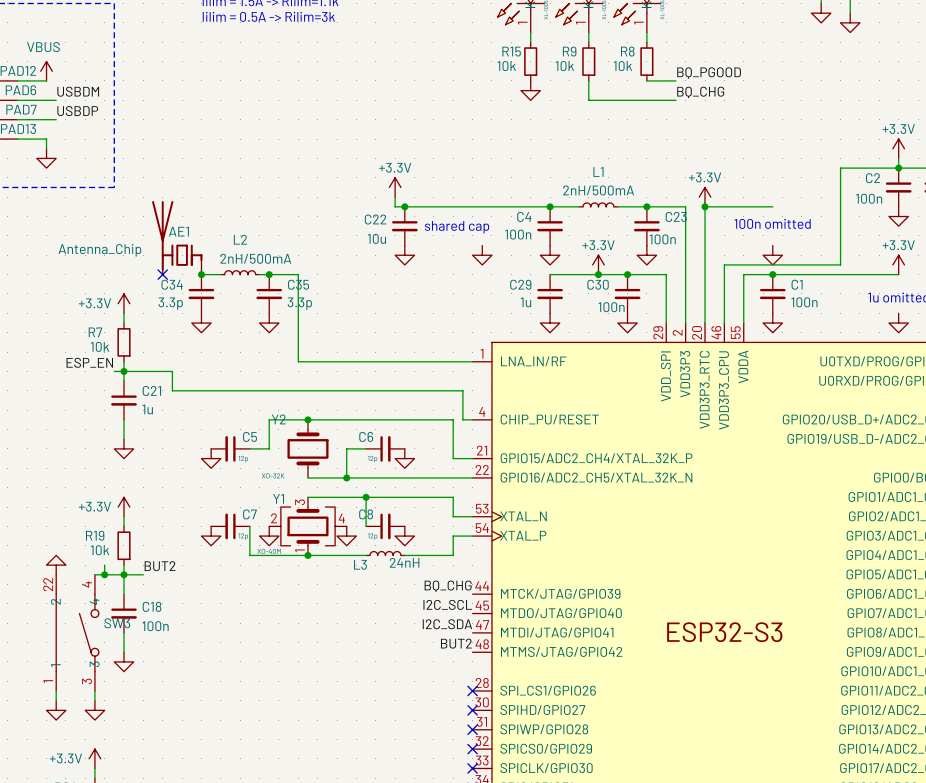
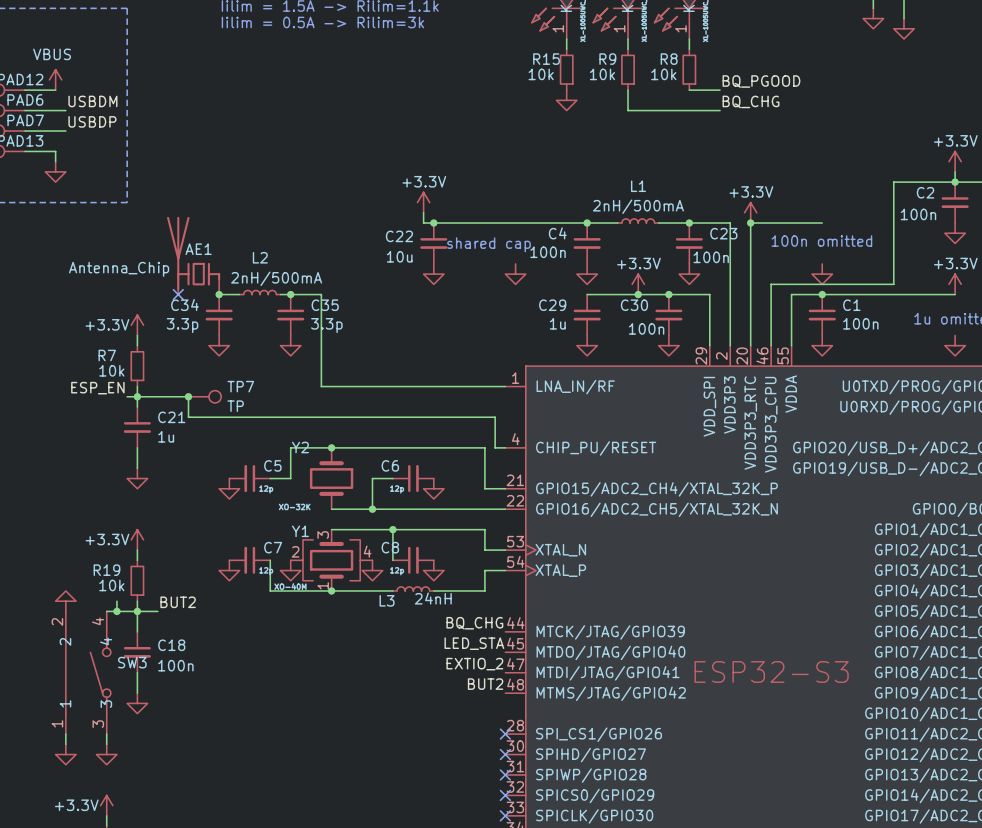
junction: none -> (188, 396)
TP7: none -> TP (204, 396)
SW3 pin number: 22 (48, 584) -> 2 (57, 621)
label: I2C_SCL (447, 604) -> LED_STA (474, 643)
label: I2C_SDA (447, 624) -> EXTIO_2 (474, 664)

